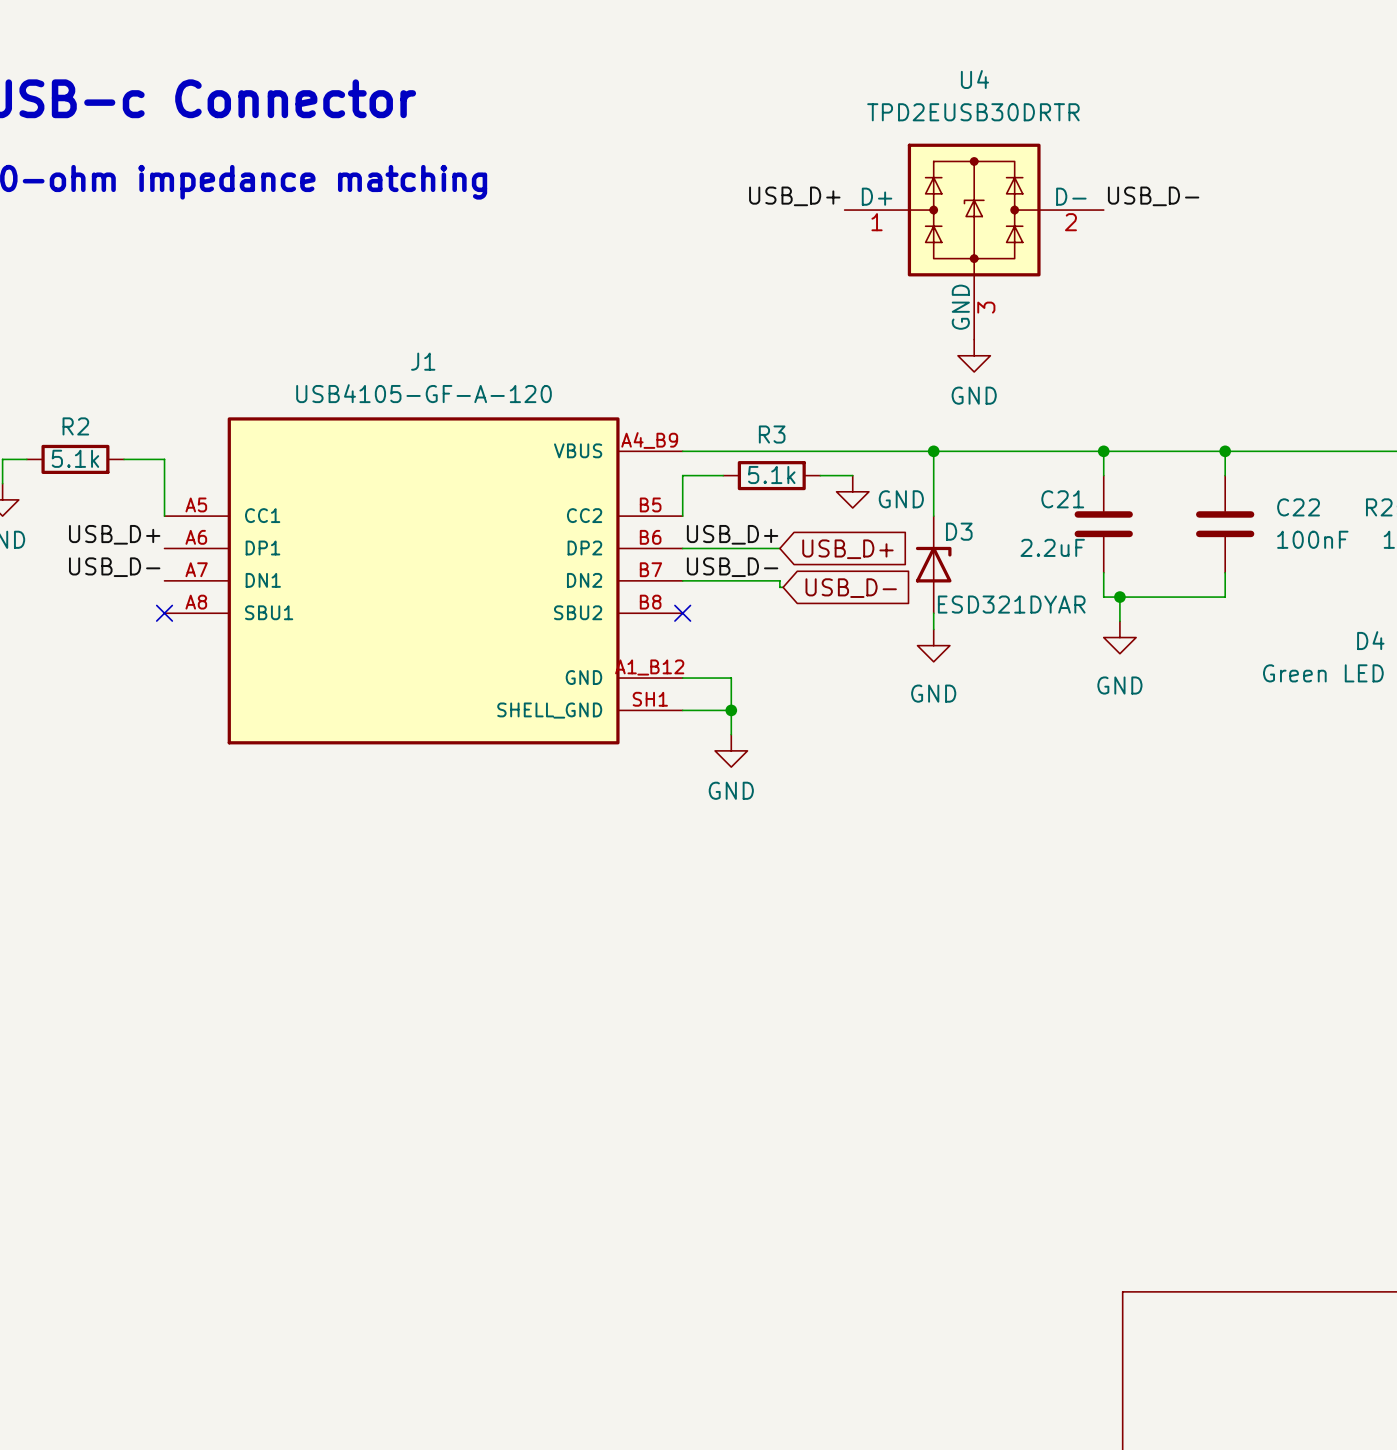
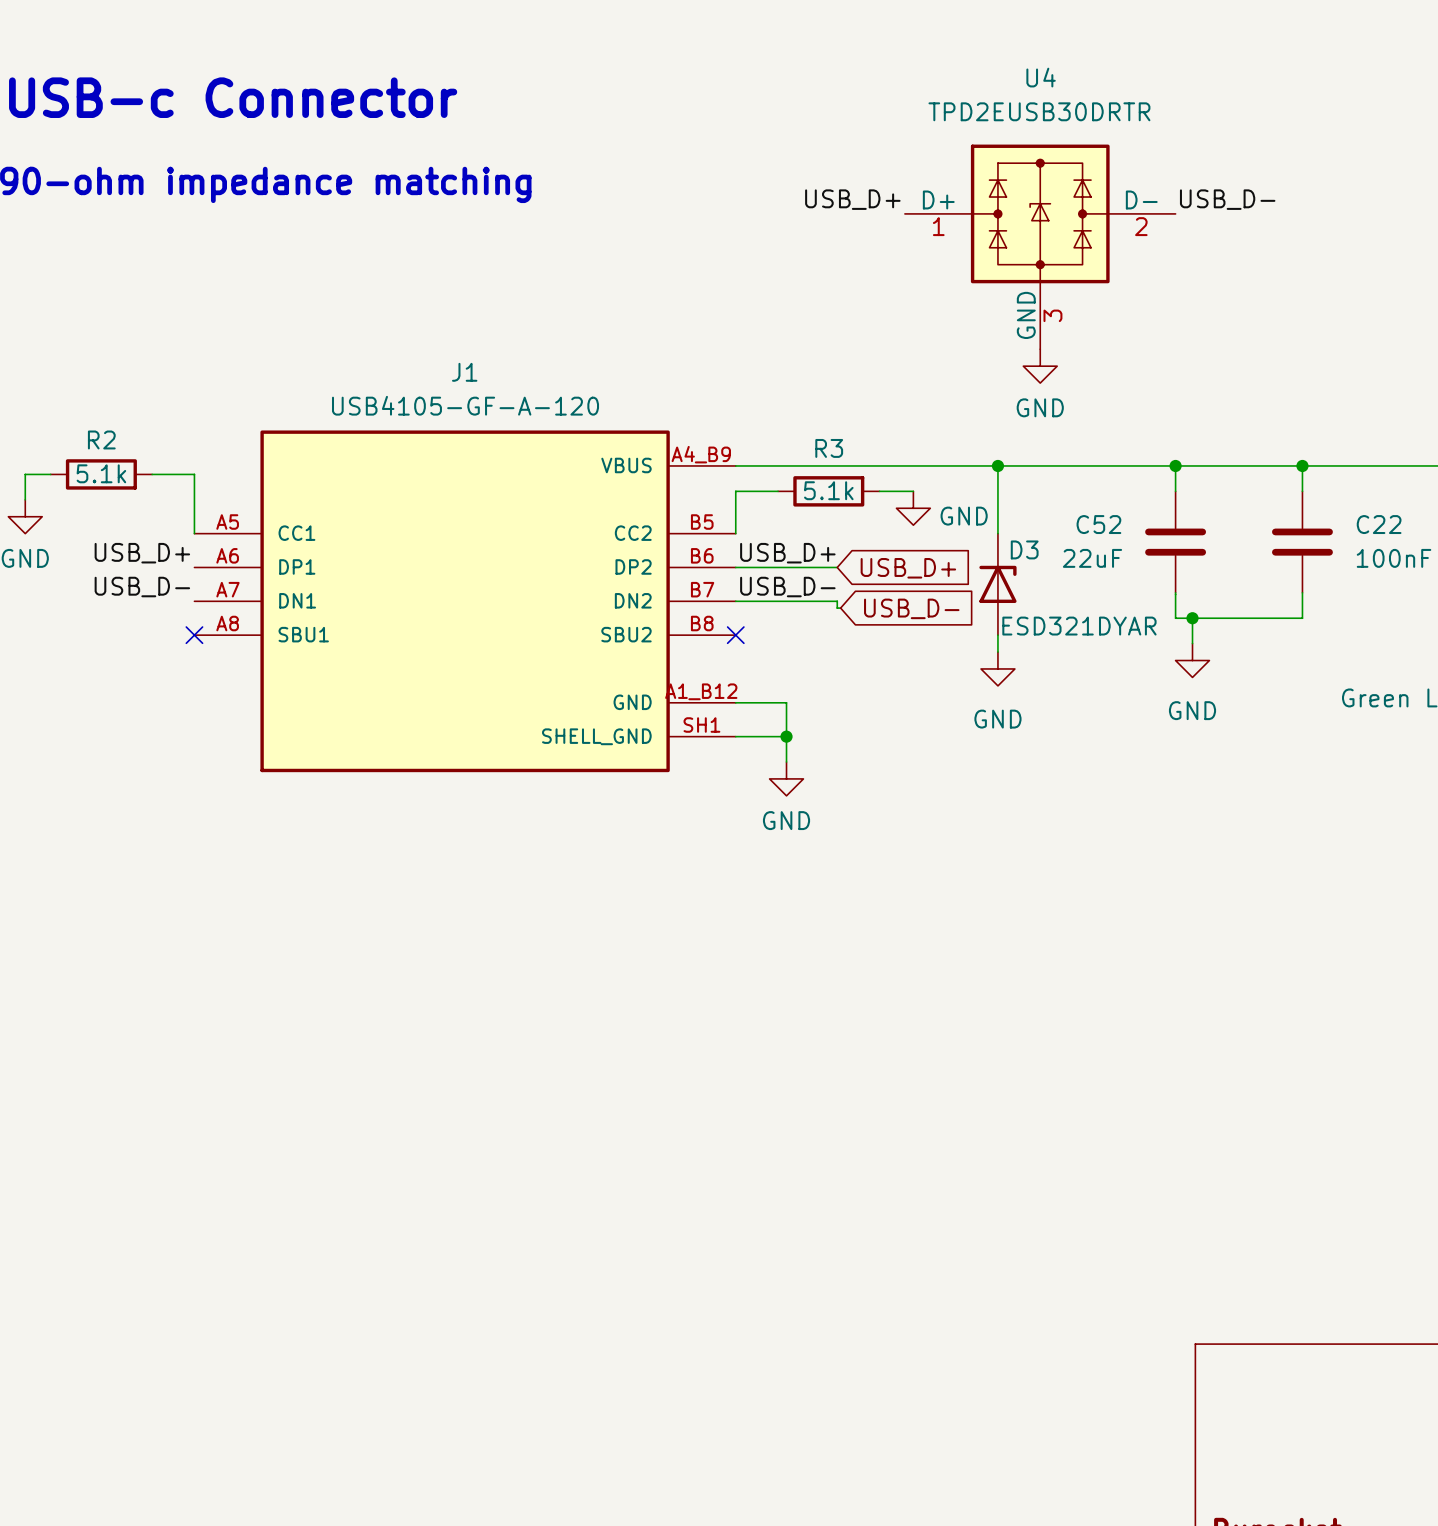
C21 name: C21 (1062, 499) -> C52 (1098, 524)
C21 value: 2.2uF (1052, 547) -> 22uF (1092, 558)

